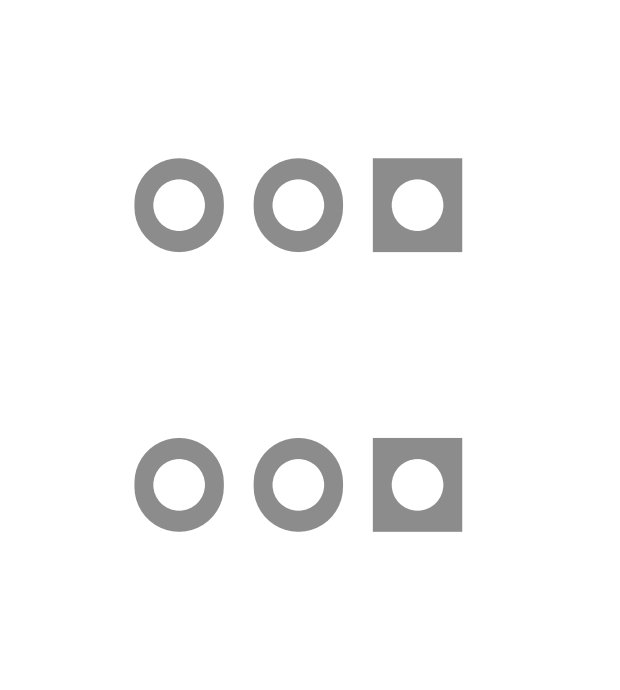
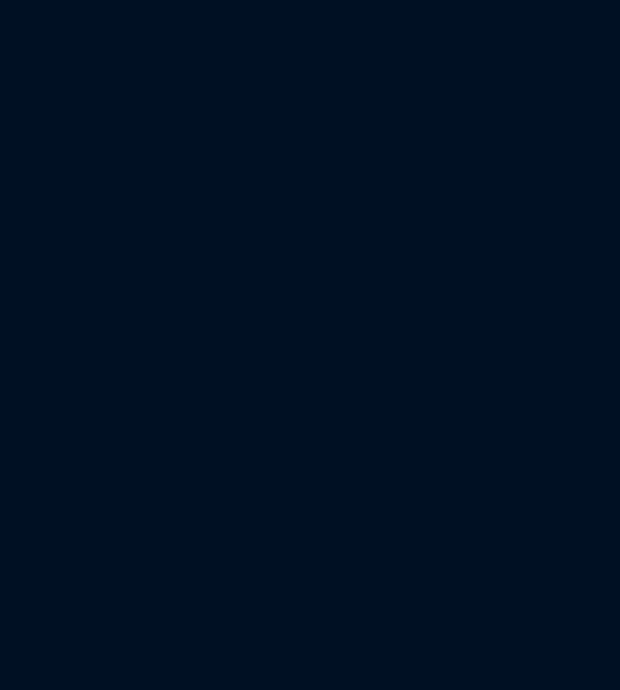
part: (298, 205) -> none
part: (298, 484) -> none

